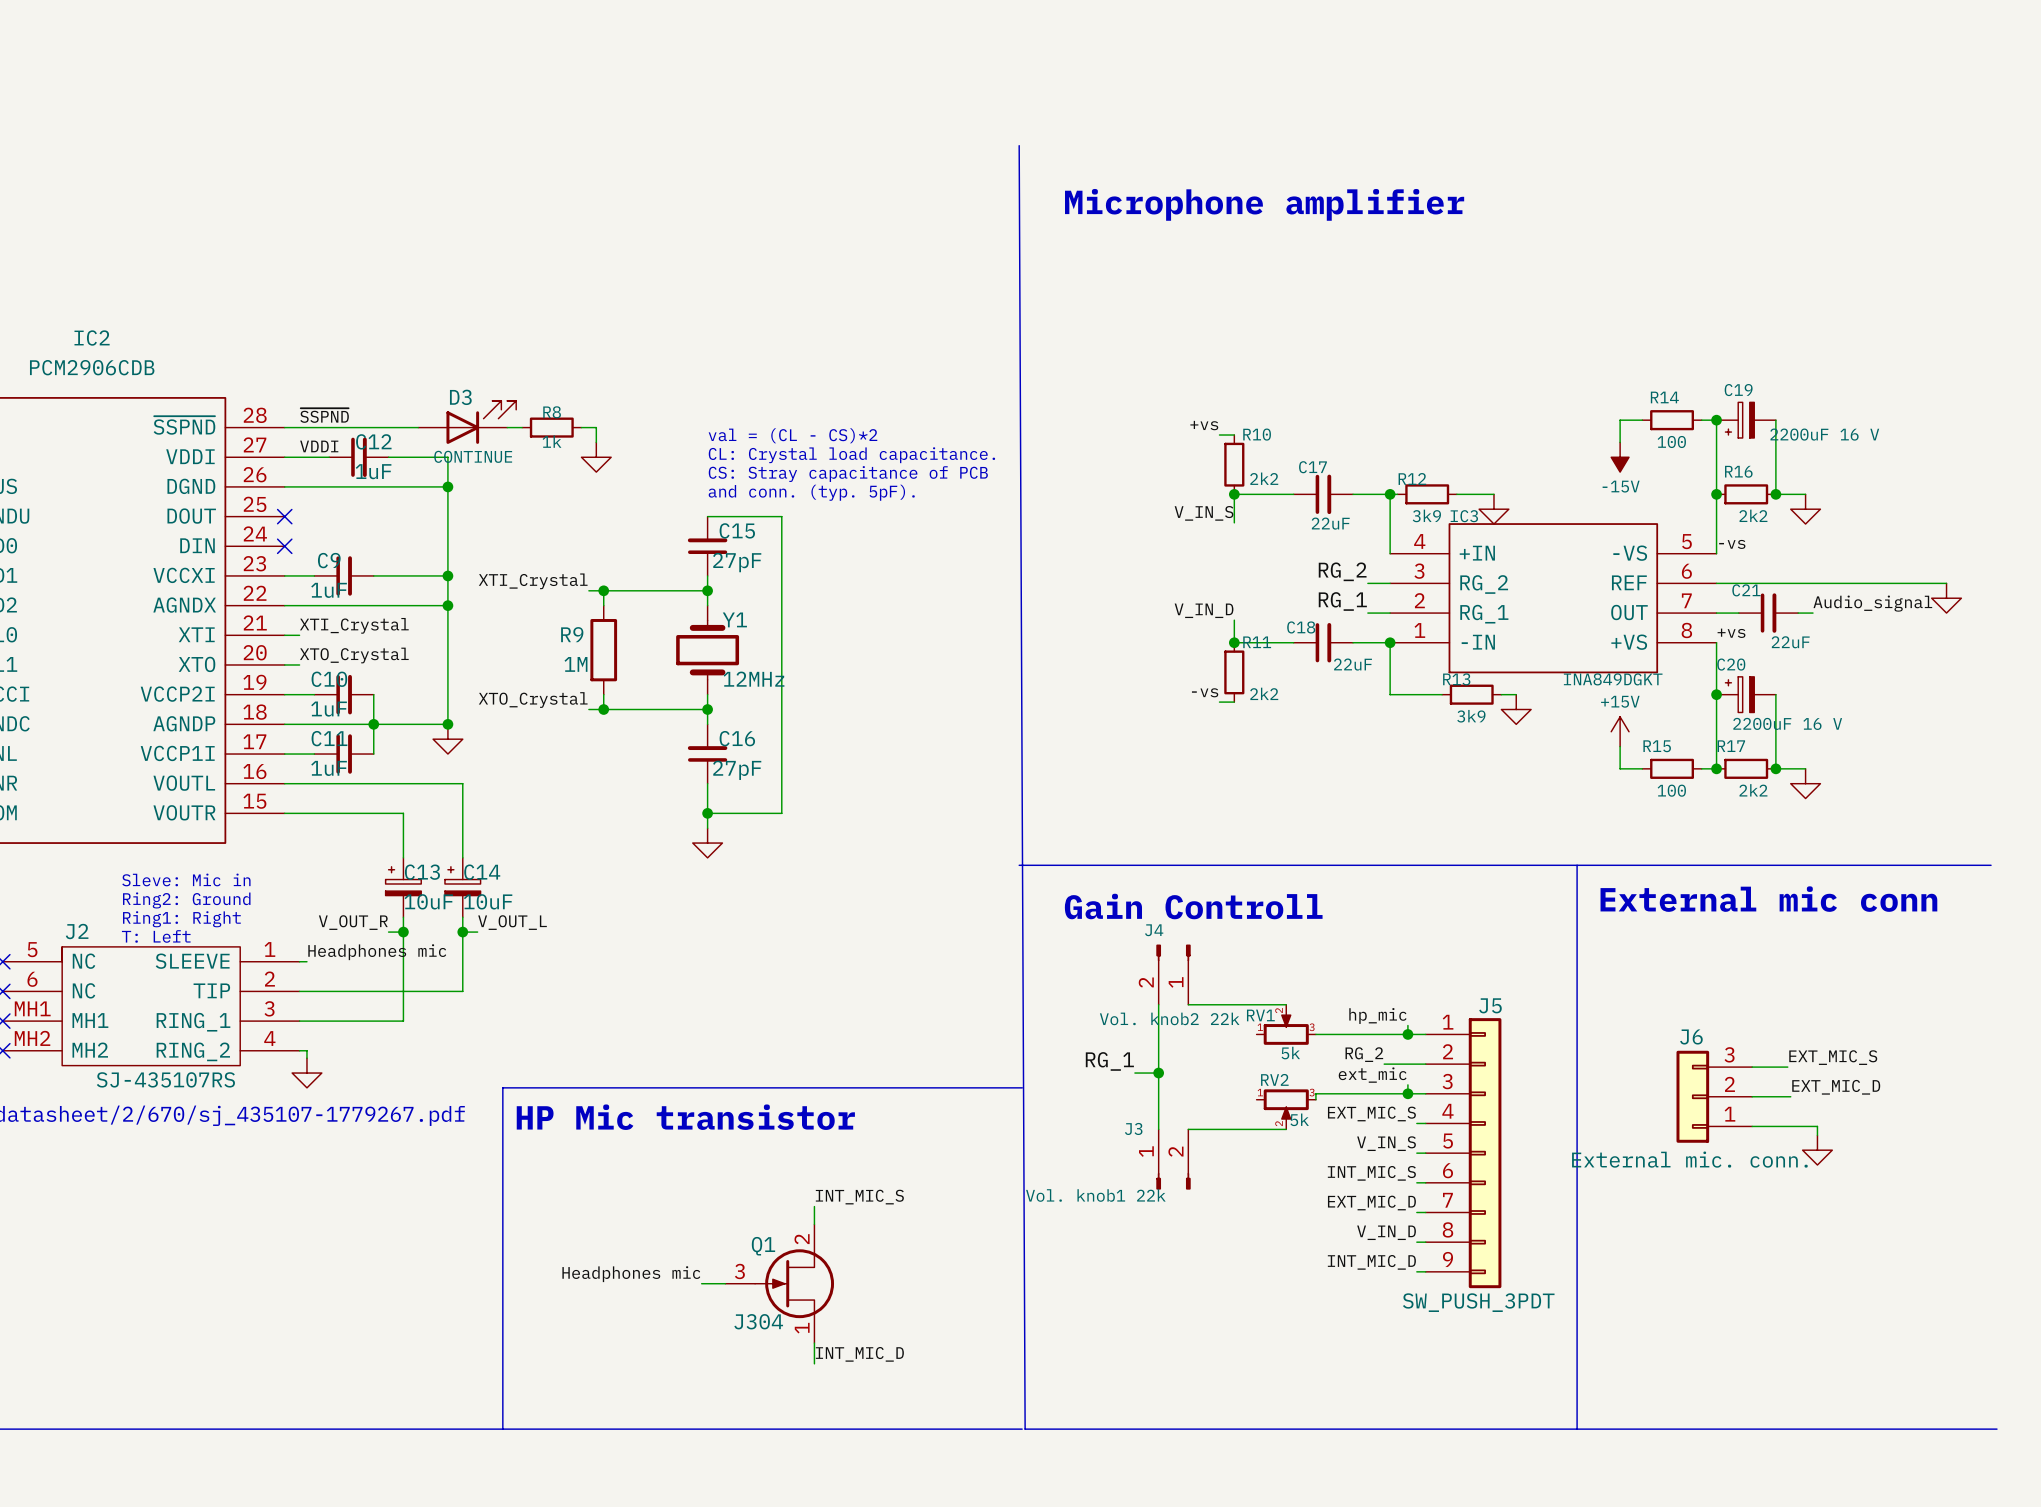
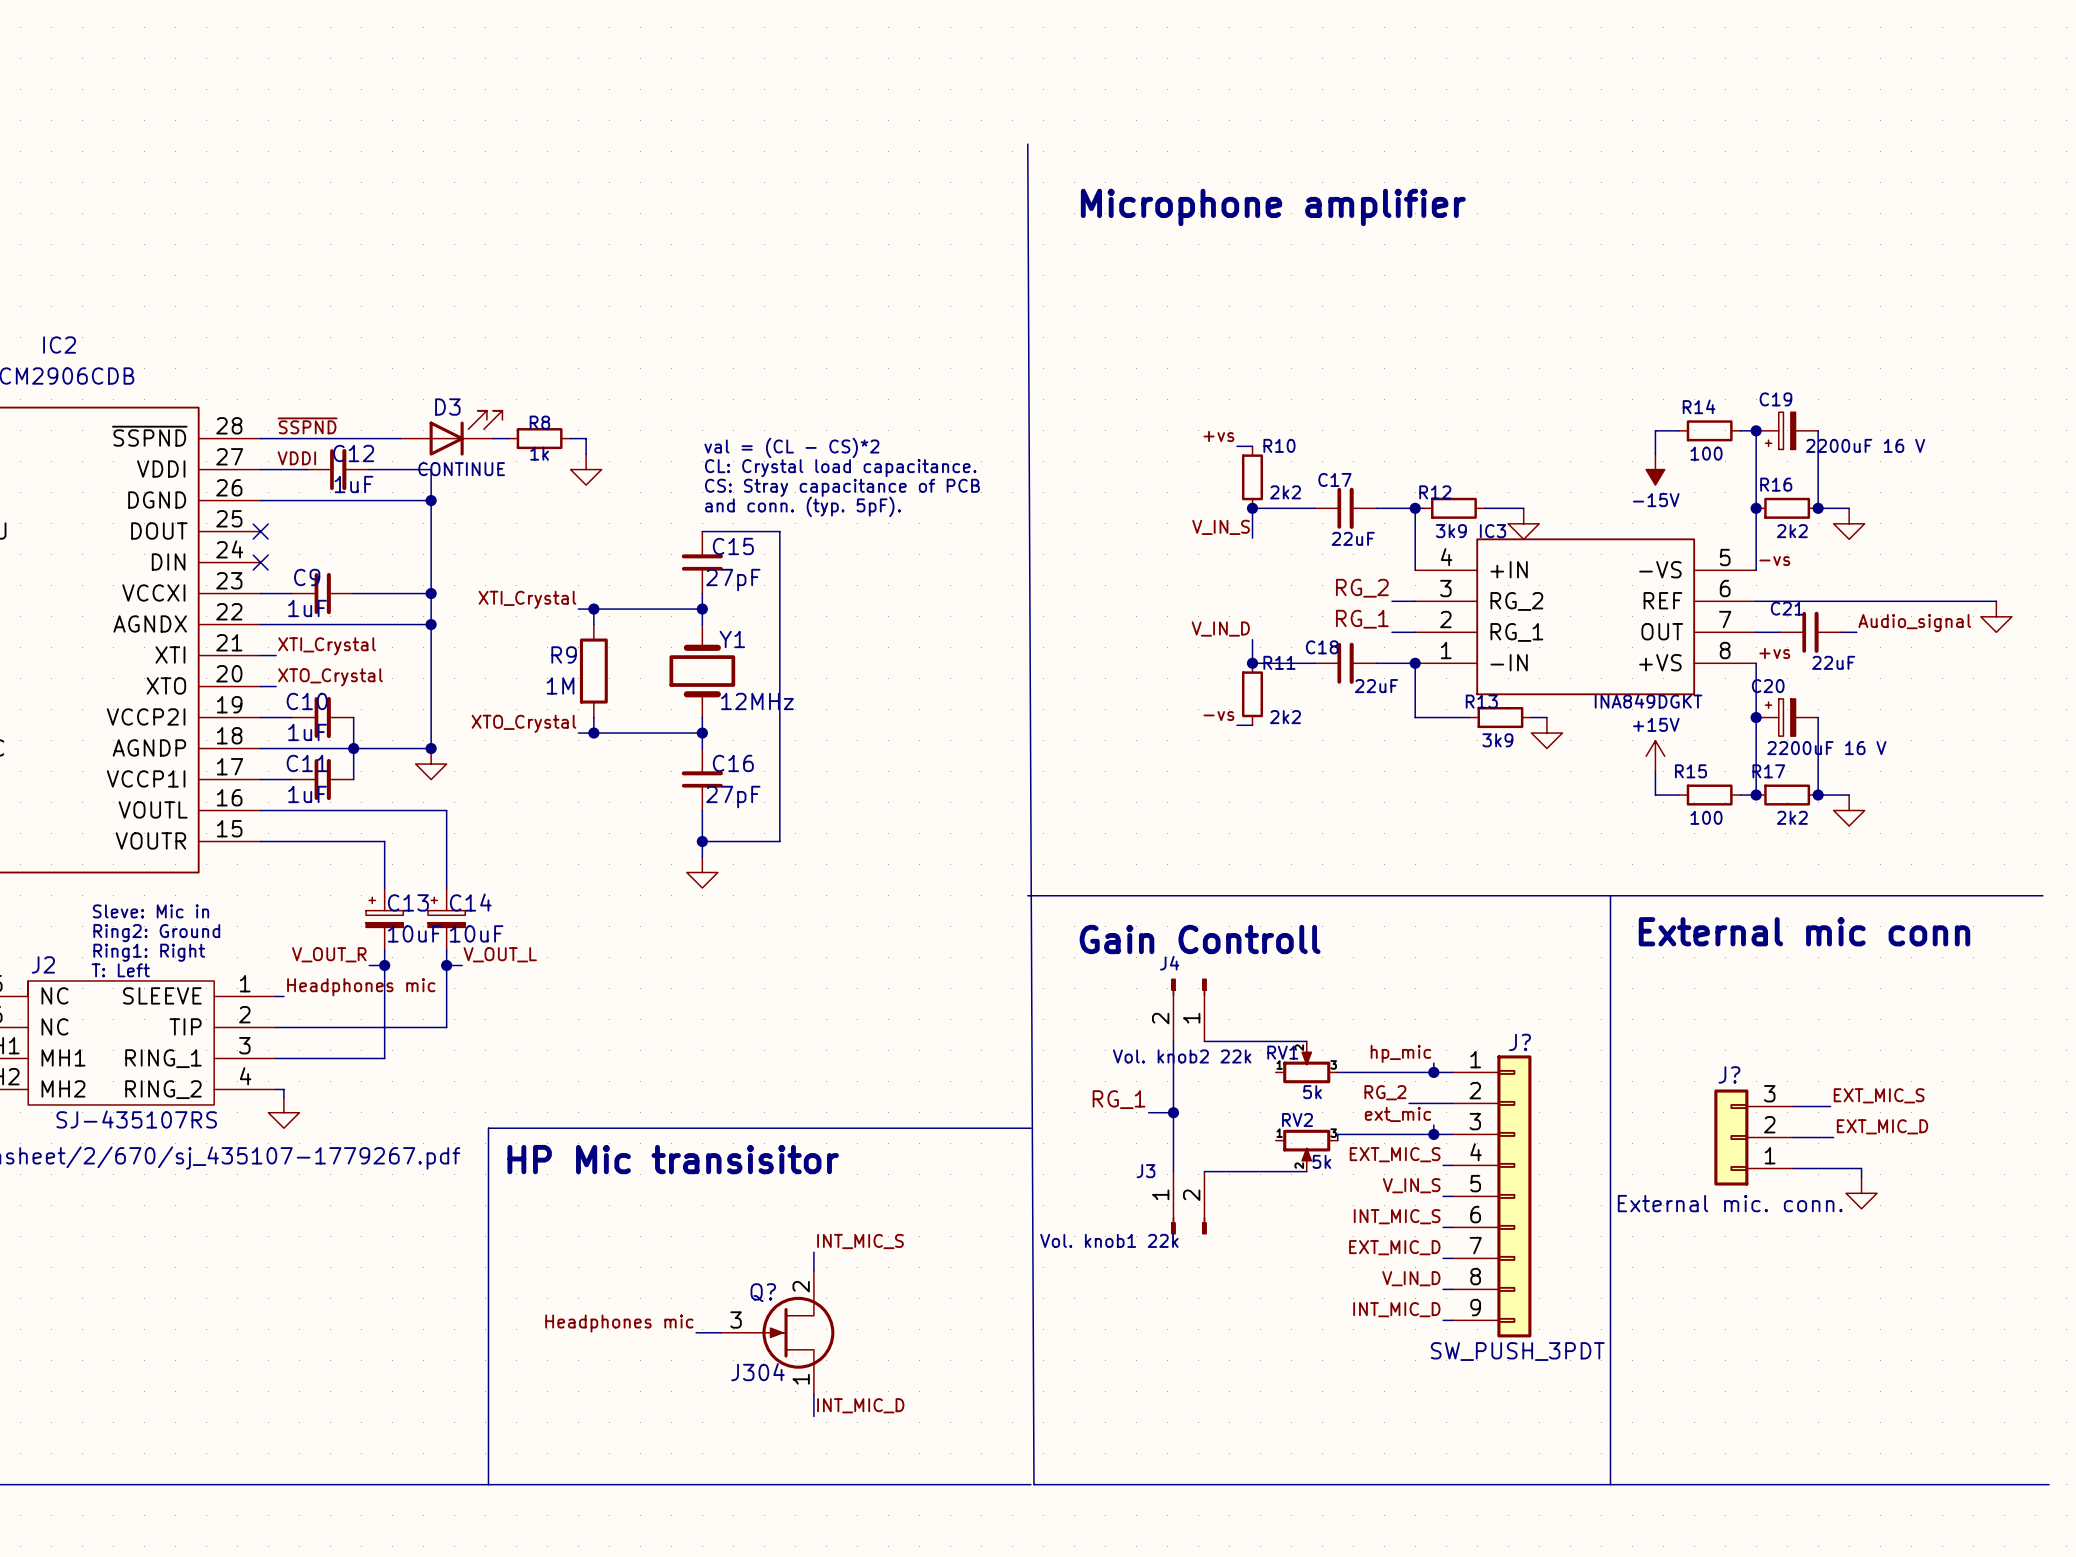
J5 name: J5 (1490, 1005) -> J? (1520, 1042)
J6 name: J6 (1691, 1036) -> J? (1729, 1074)
text: HP Mic transistor (685, 1117) -> HP Mic transisitor (673, 1159)
Q1 name: Q1 (763, 1246) -> Q? (763, 1292)

